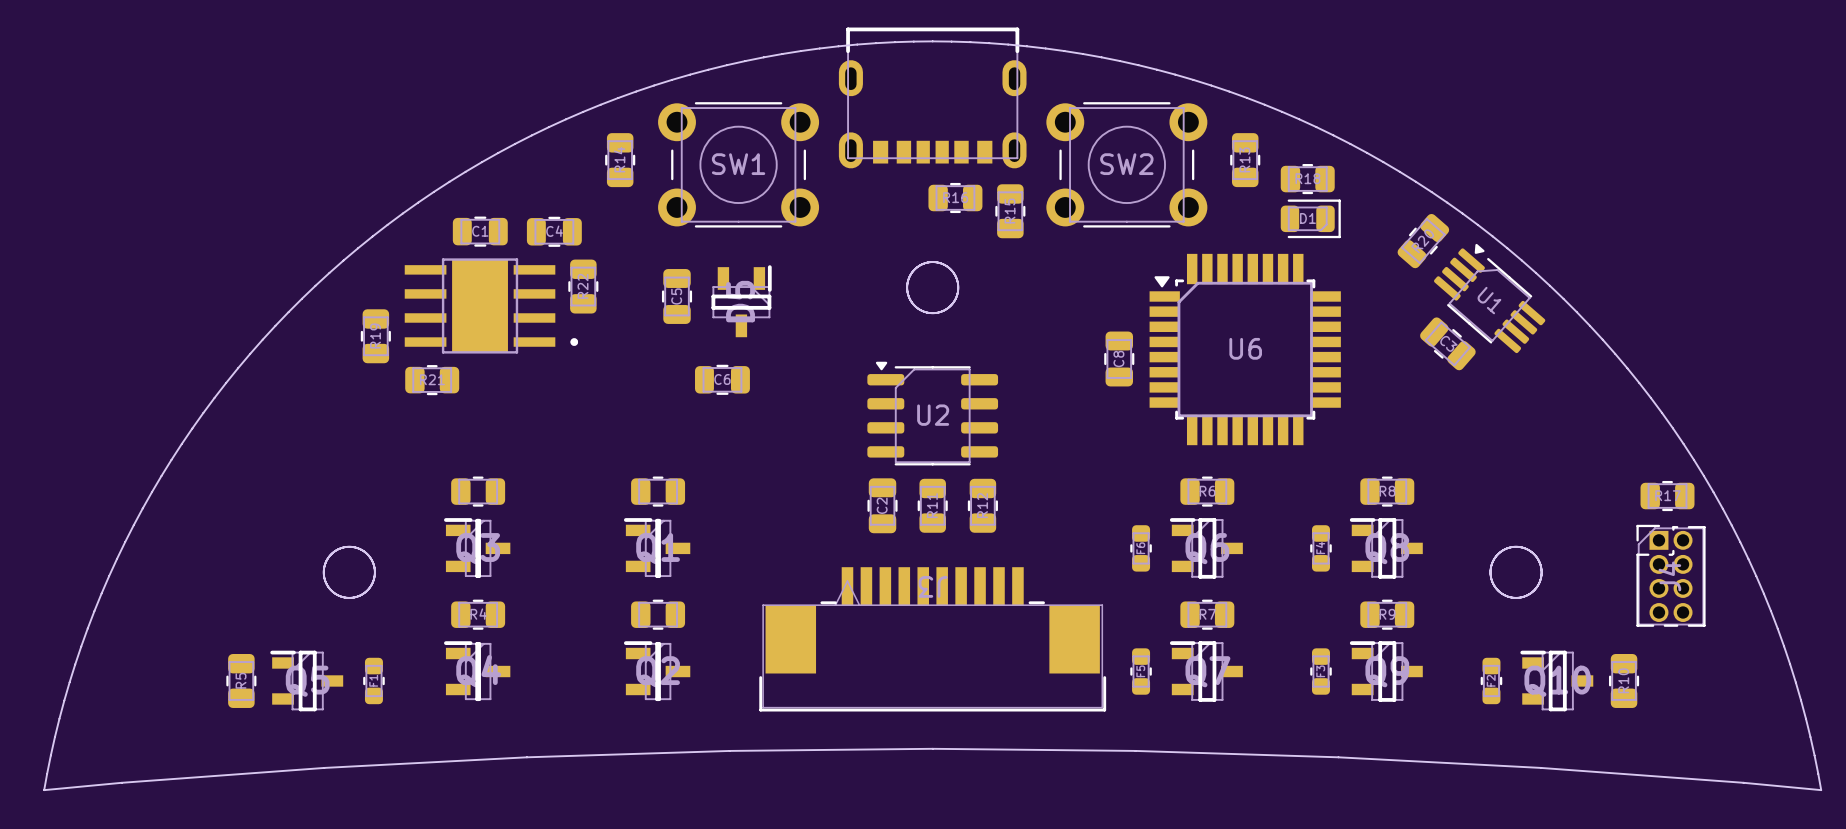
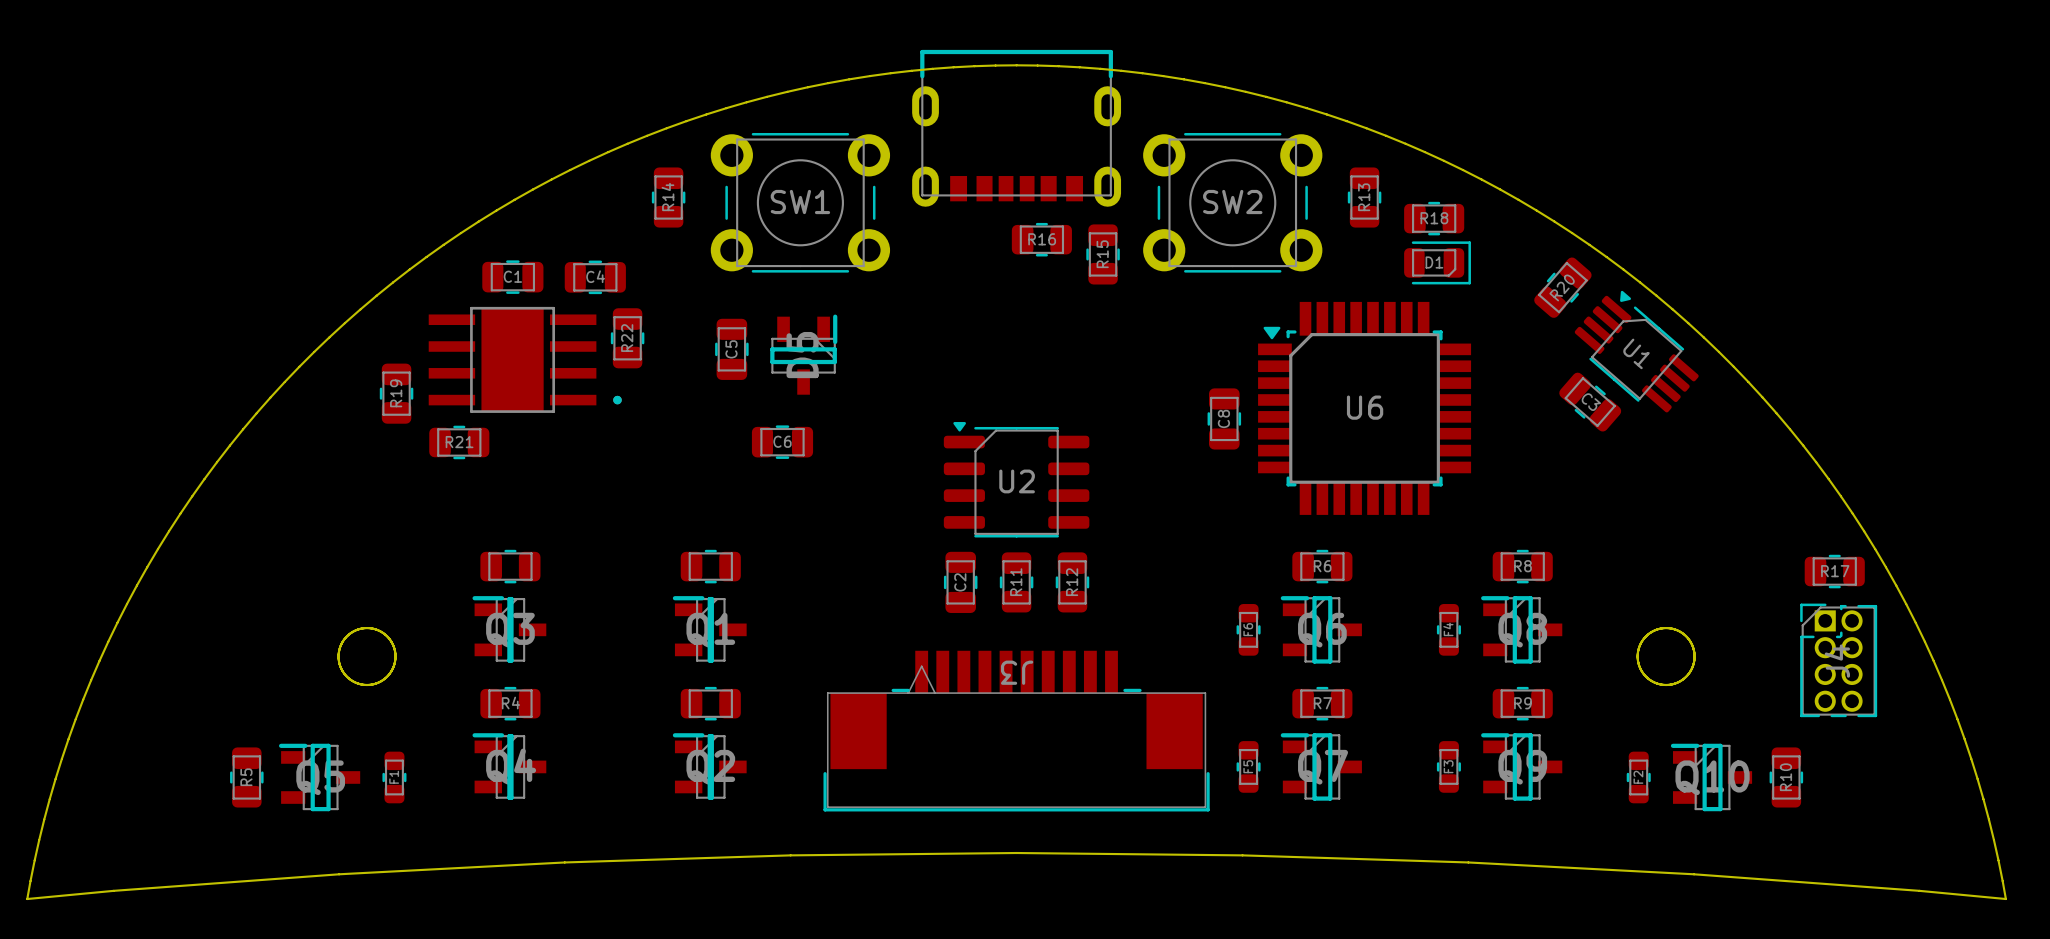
drawing shape: [43, 40, 1823, 792] -> [26, 64, 2007, 901]

